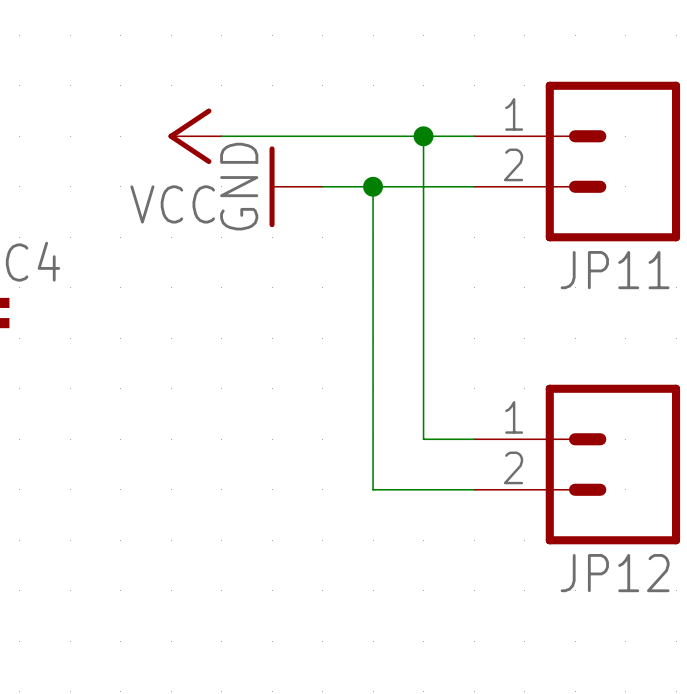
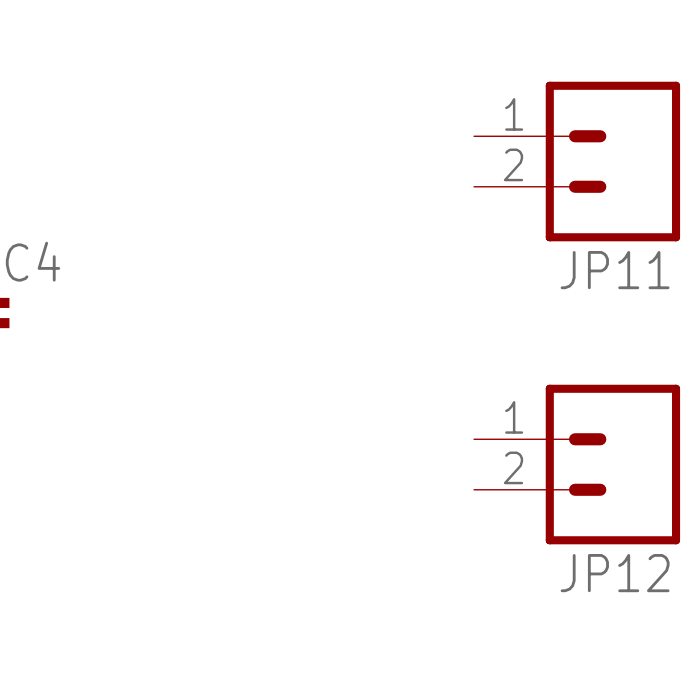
power symbol: VCC (195, 136) -> none
wire: (221, 136) (474, 136) -> none
wire: (423, 136) (423, 439) (474, 439) -> none
junction: (423, 136) -> none
power symbol: GND (296, 186) -> none
wire: (322, 186) (474, 186) -> none
wire: (373, 186) (373, 489) (474, 489) -> none
junction: (373, 186) -> none

